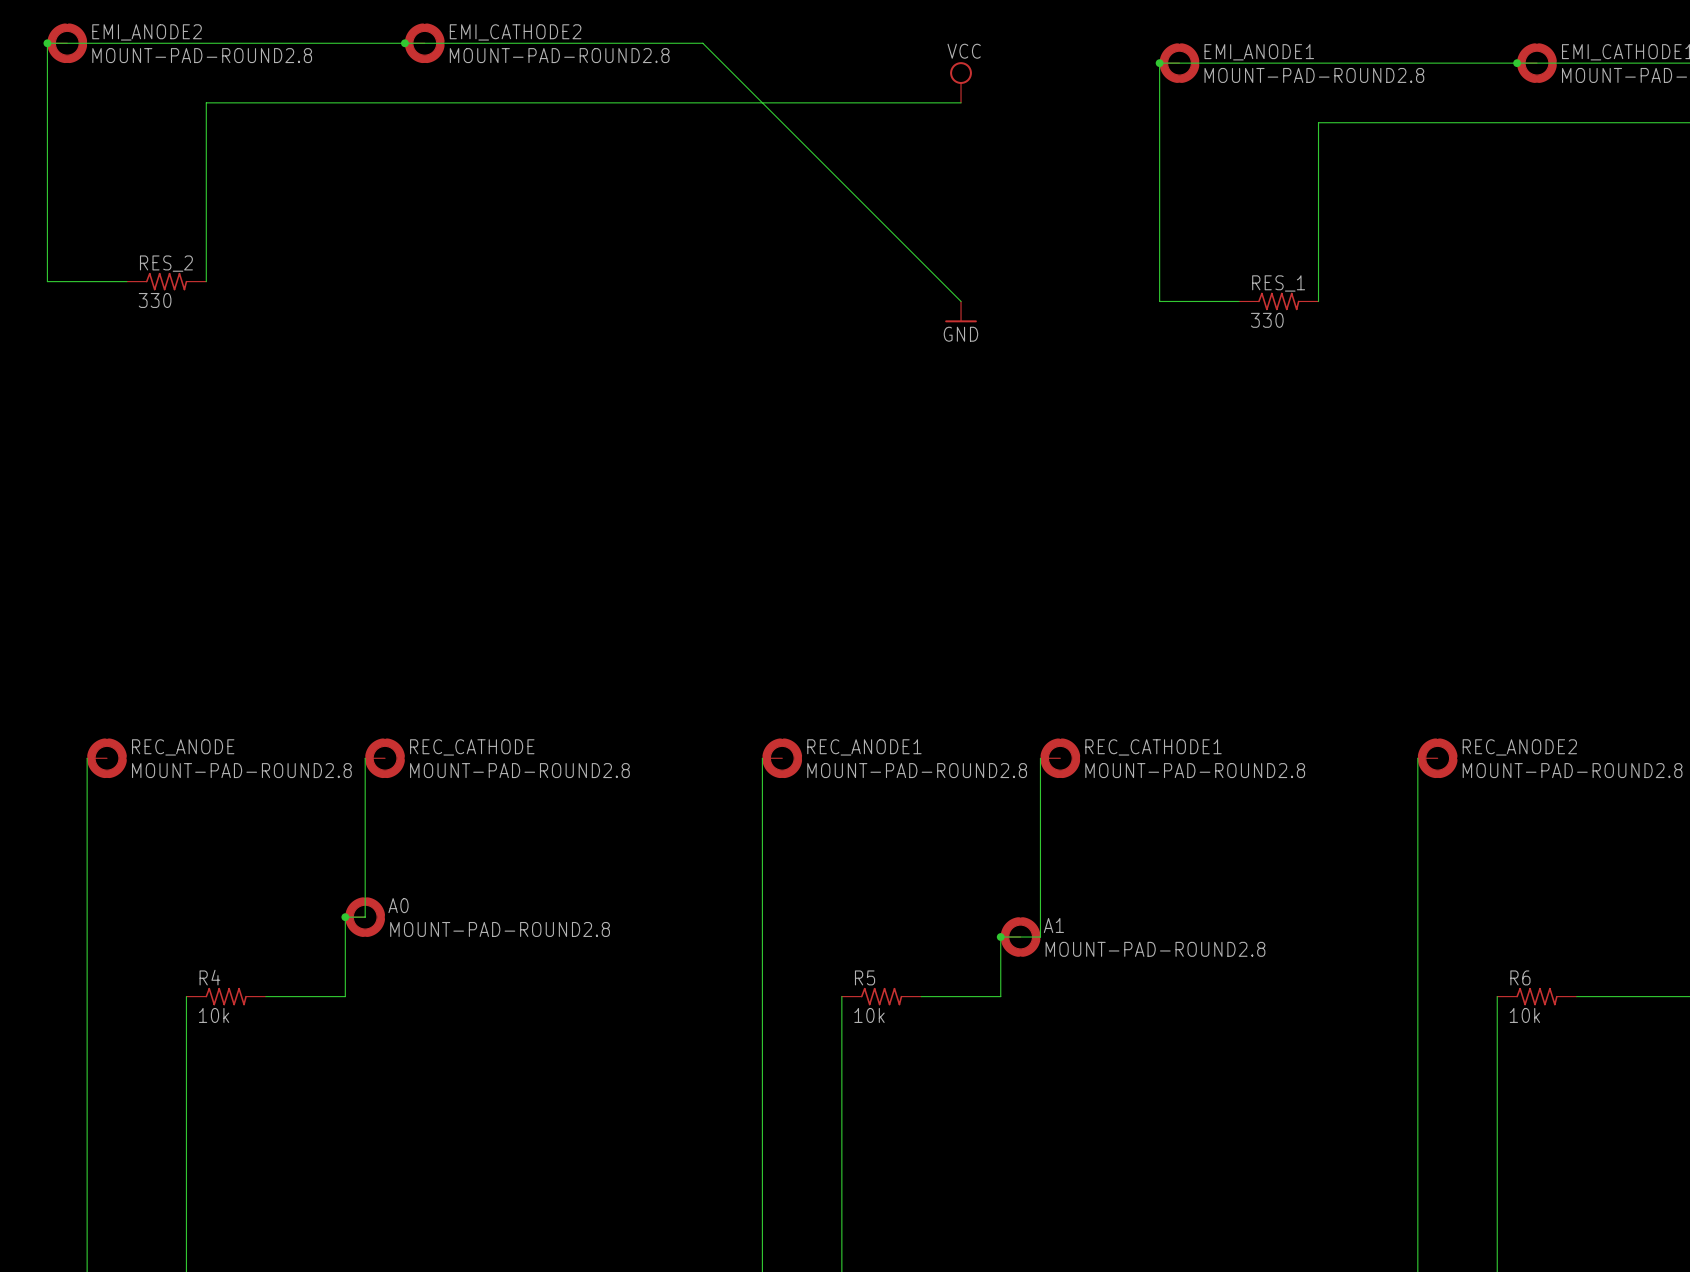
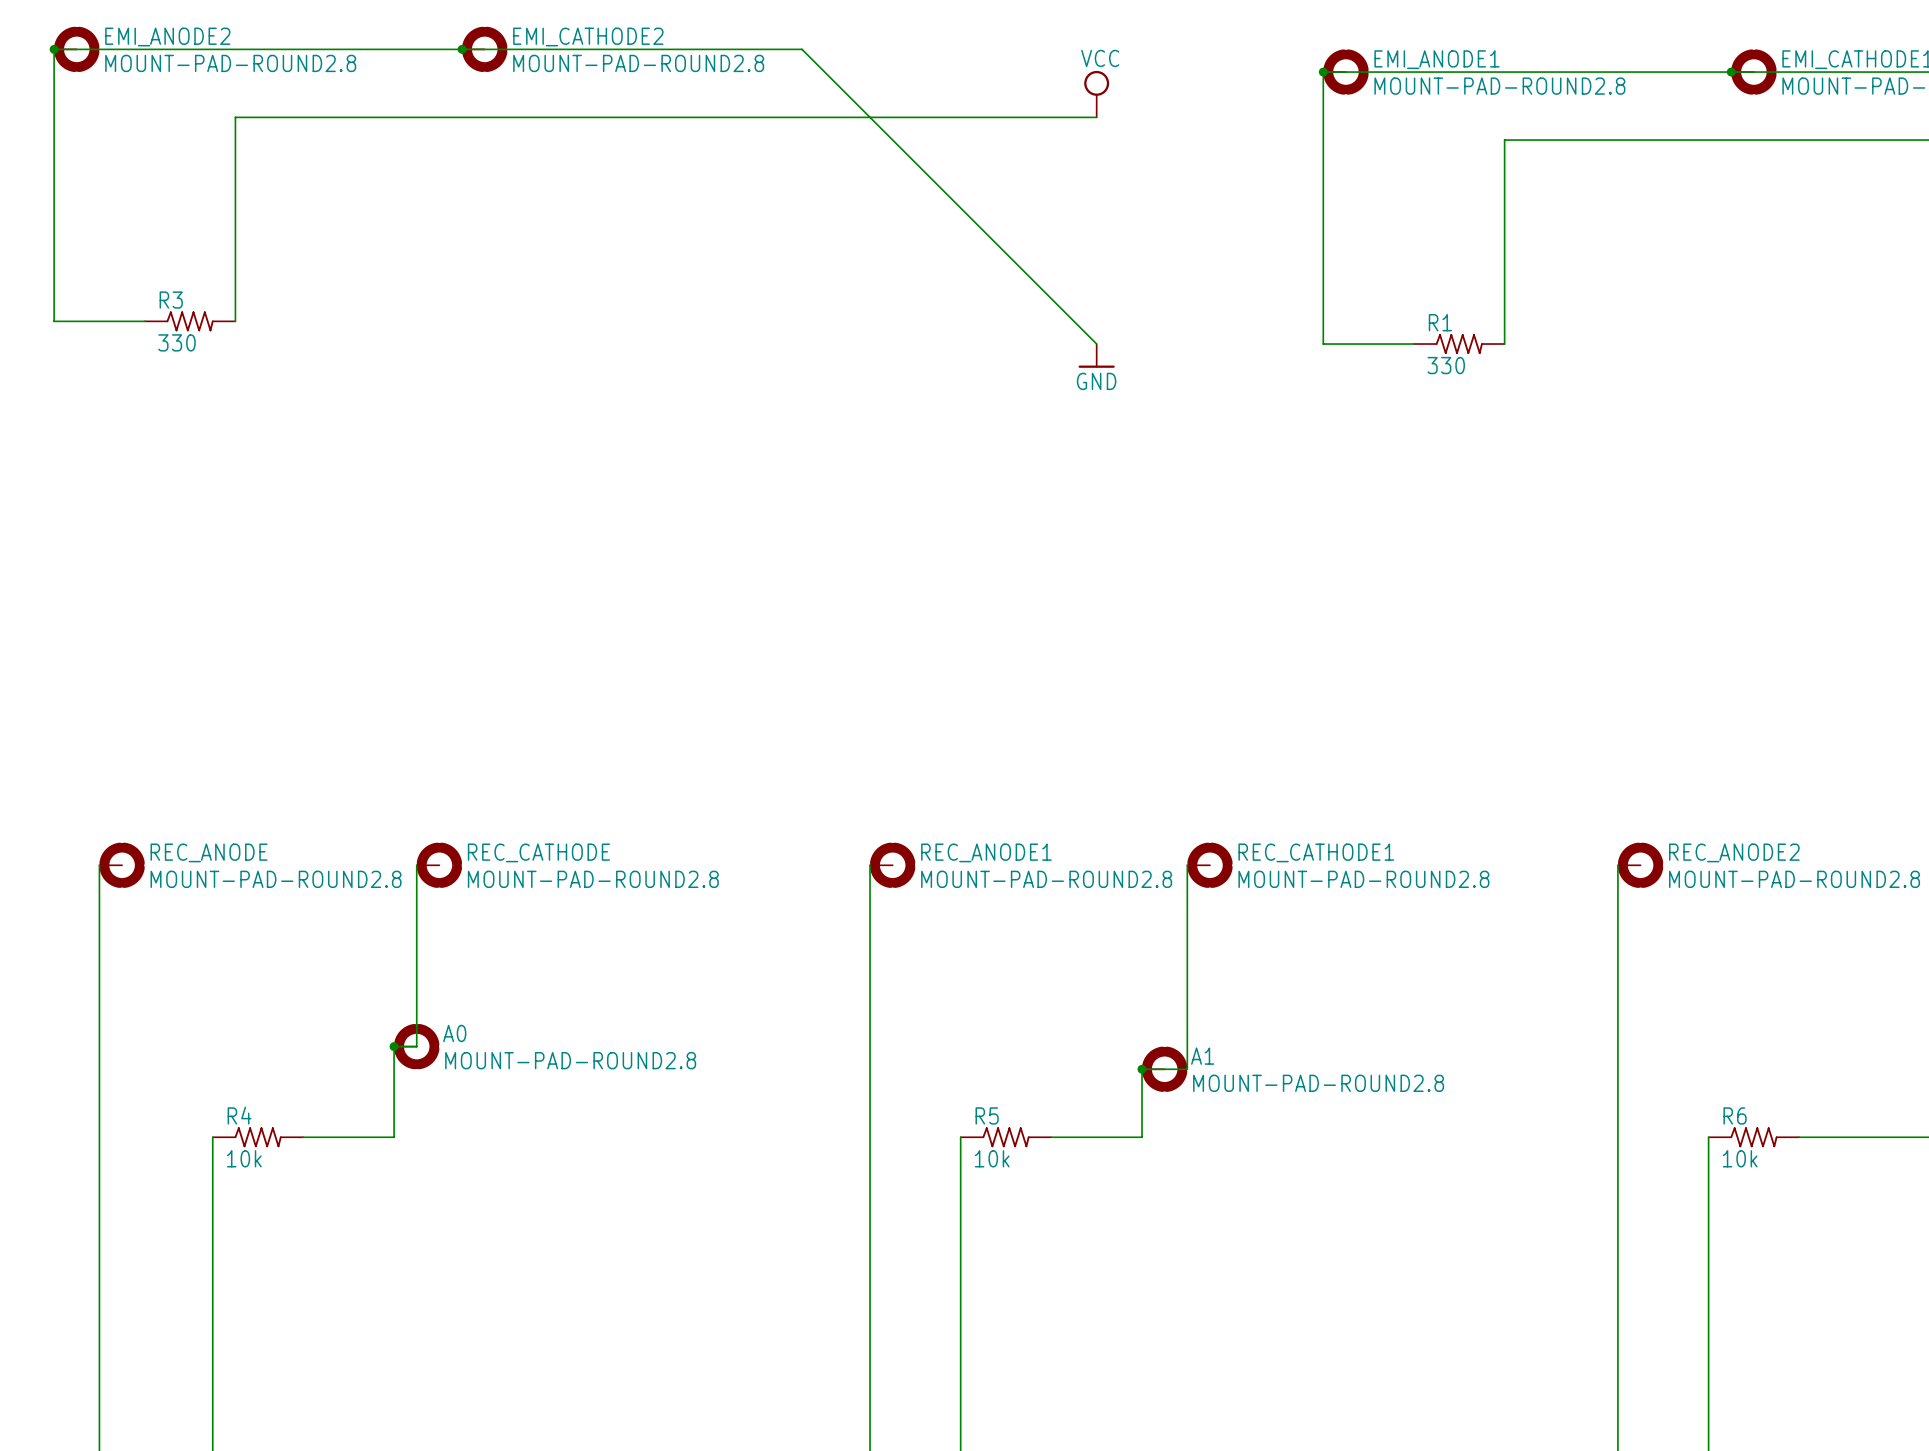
RES_2 name: RES_2 (166, 263) -> R3 (171, 300)
RES_1 name: RES_1 (1278, 283) -> R1 (1440, 322)

